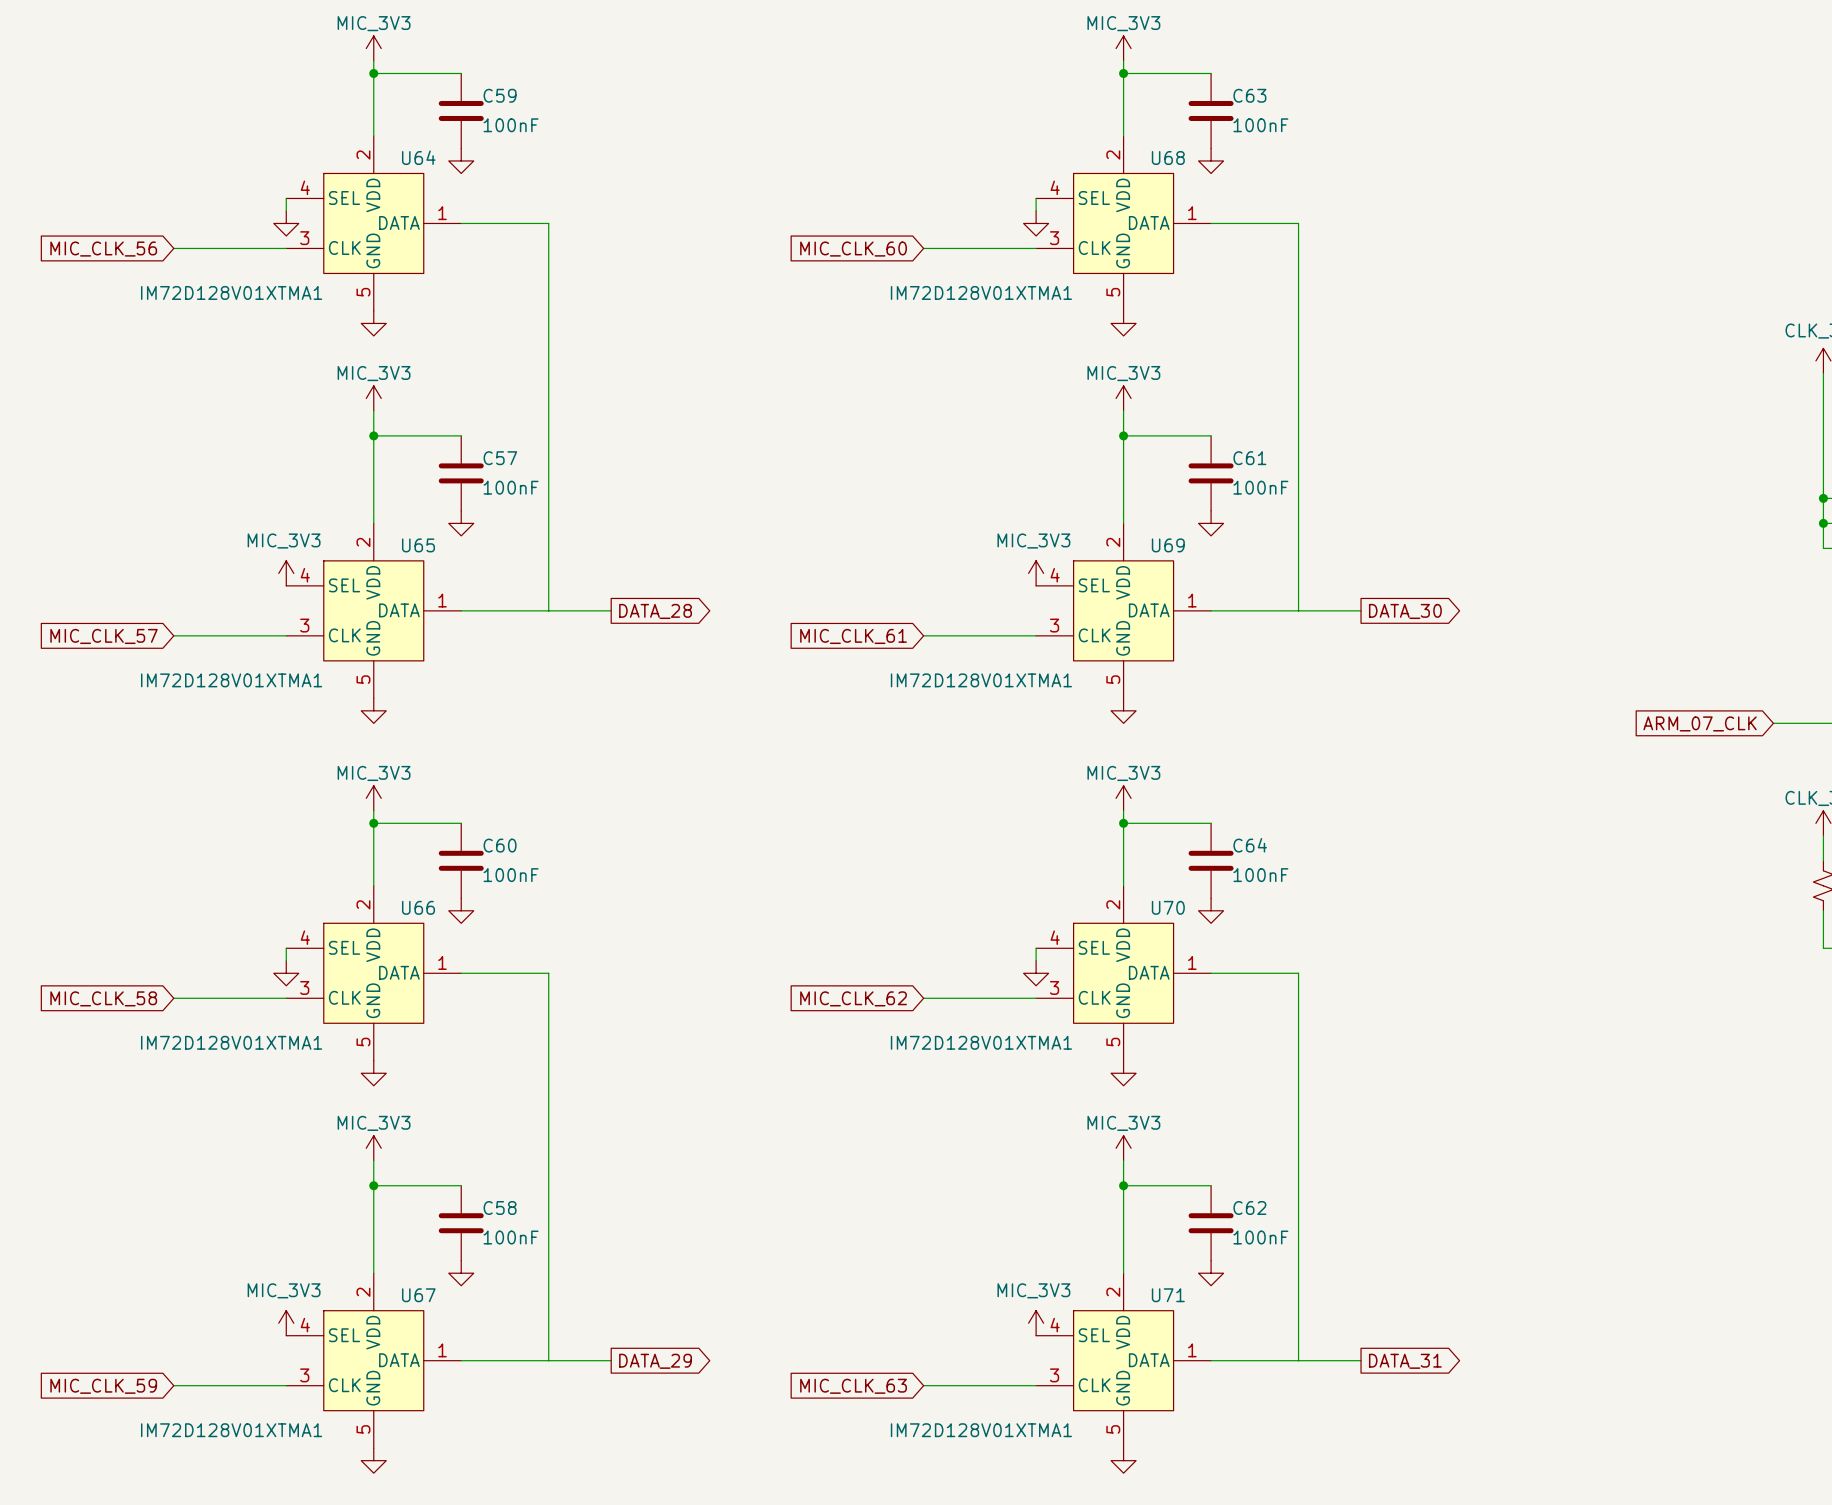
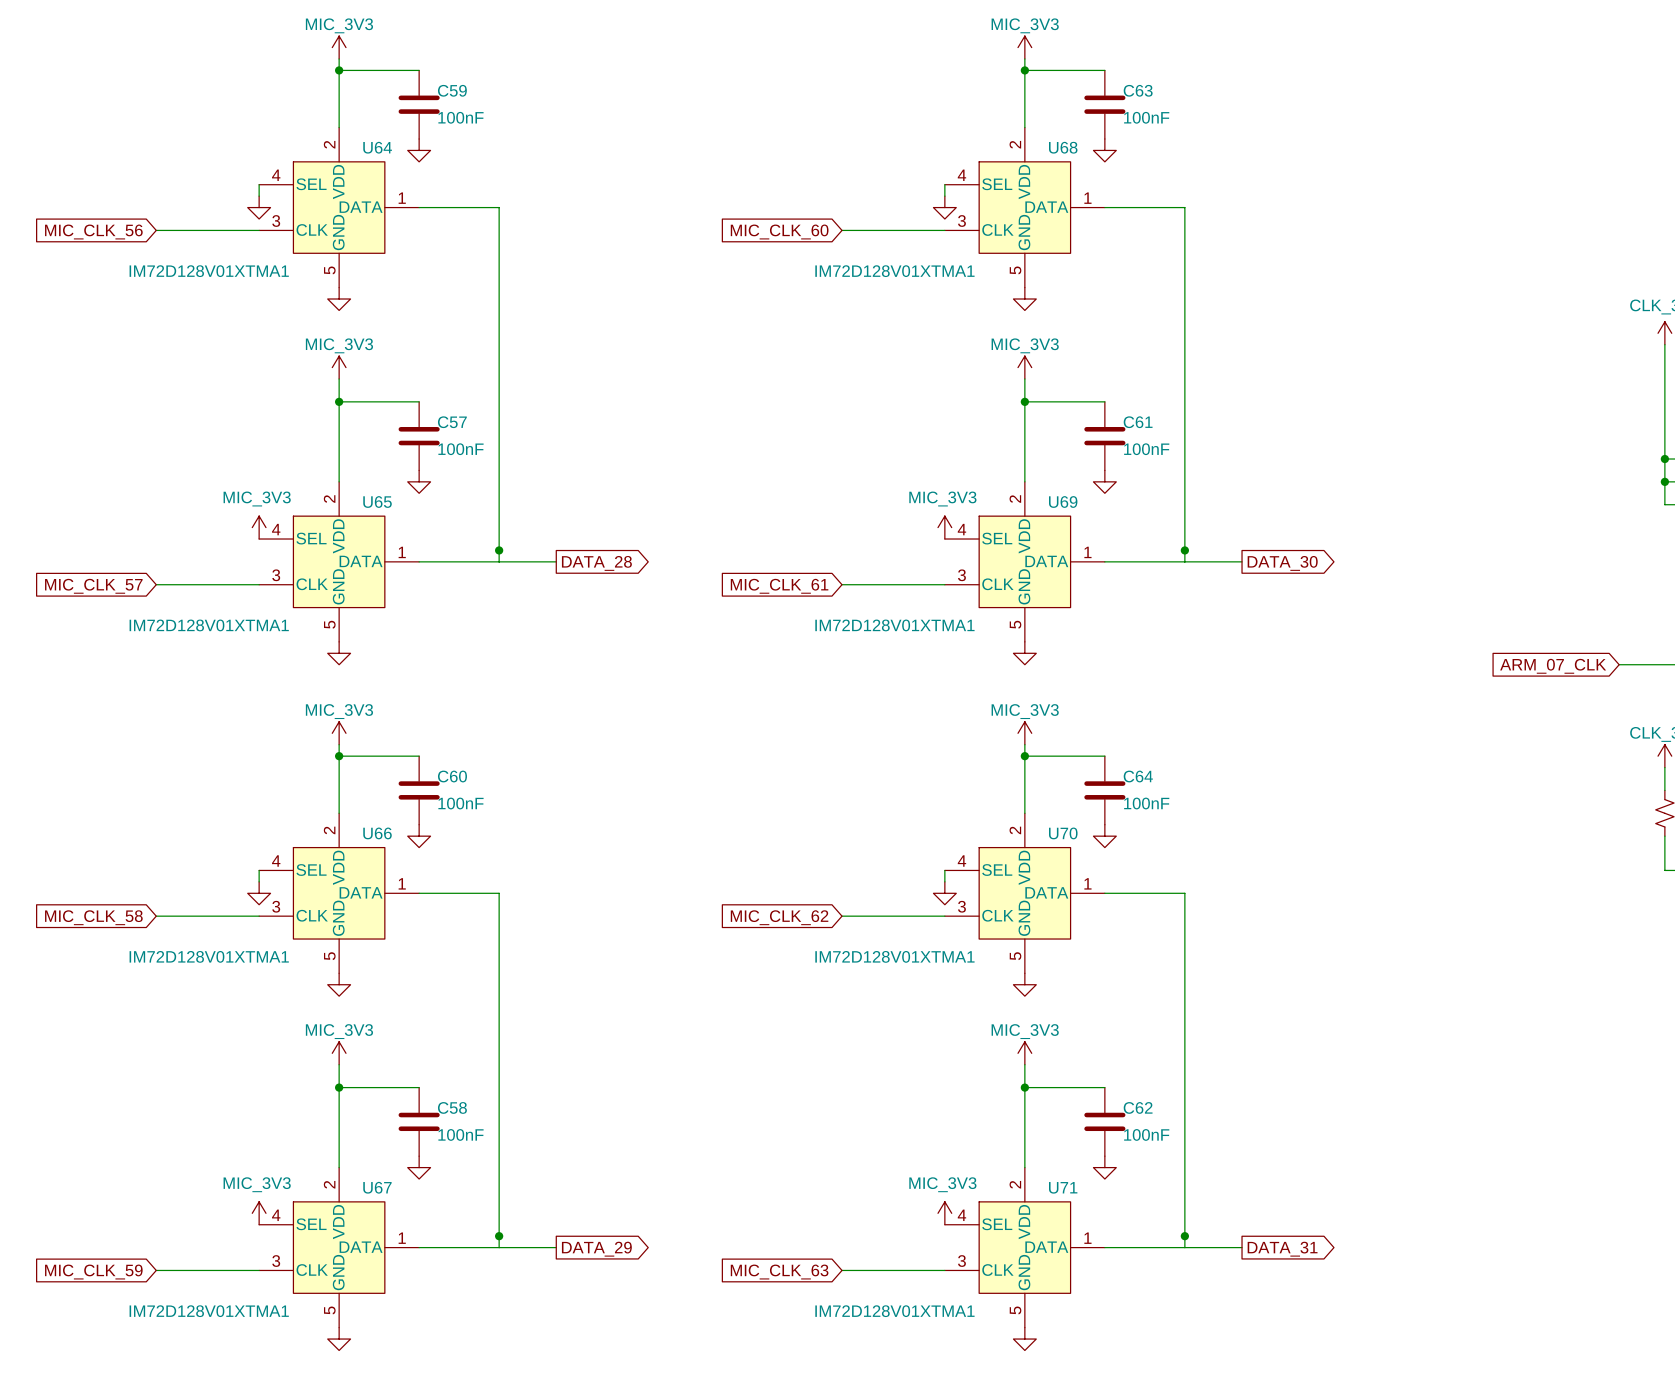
junction: none -> (499, 550)
junction: none -> (1184, 550)
junction: none -> (499, 1236)
junction: none -> (1184, 1236)

